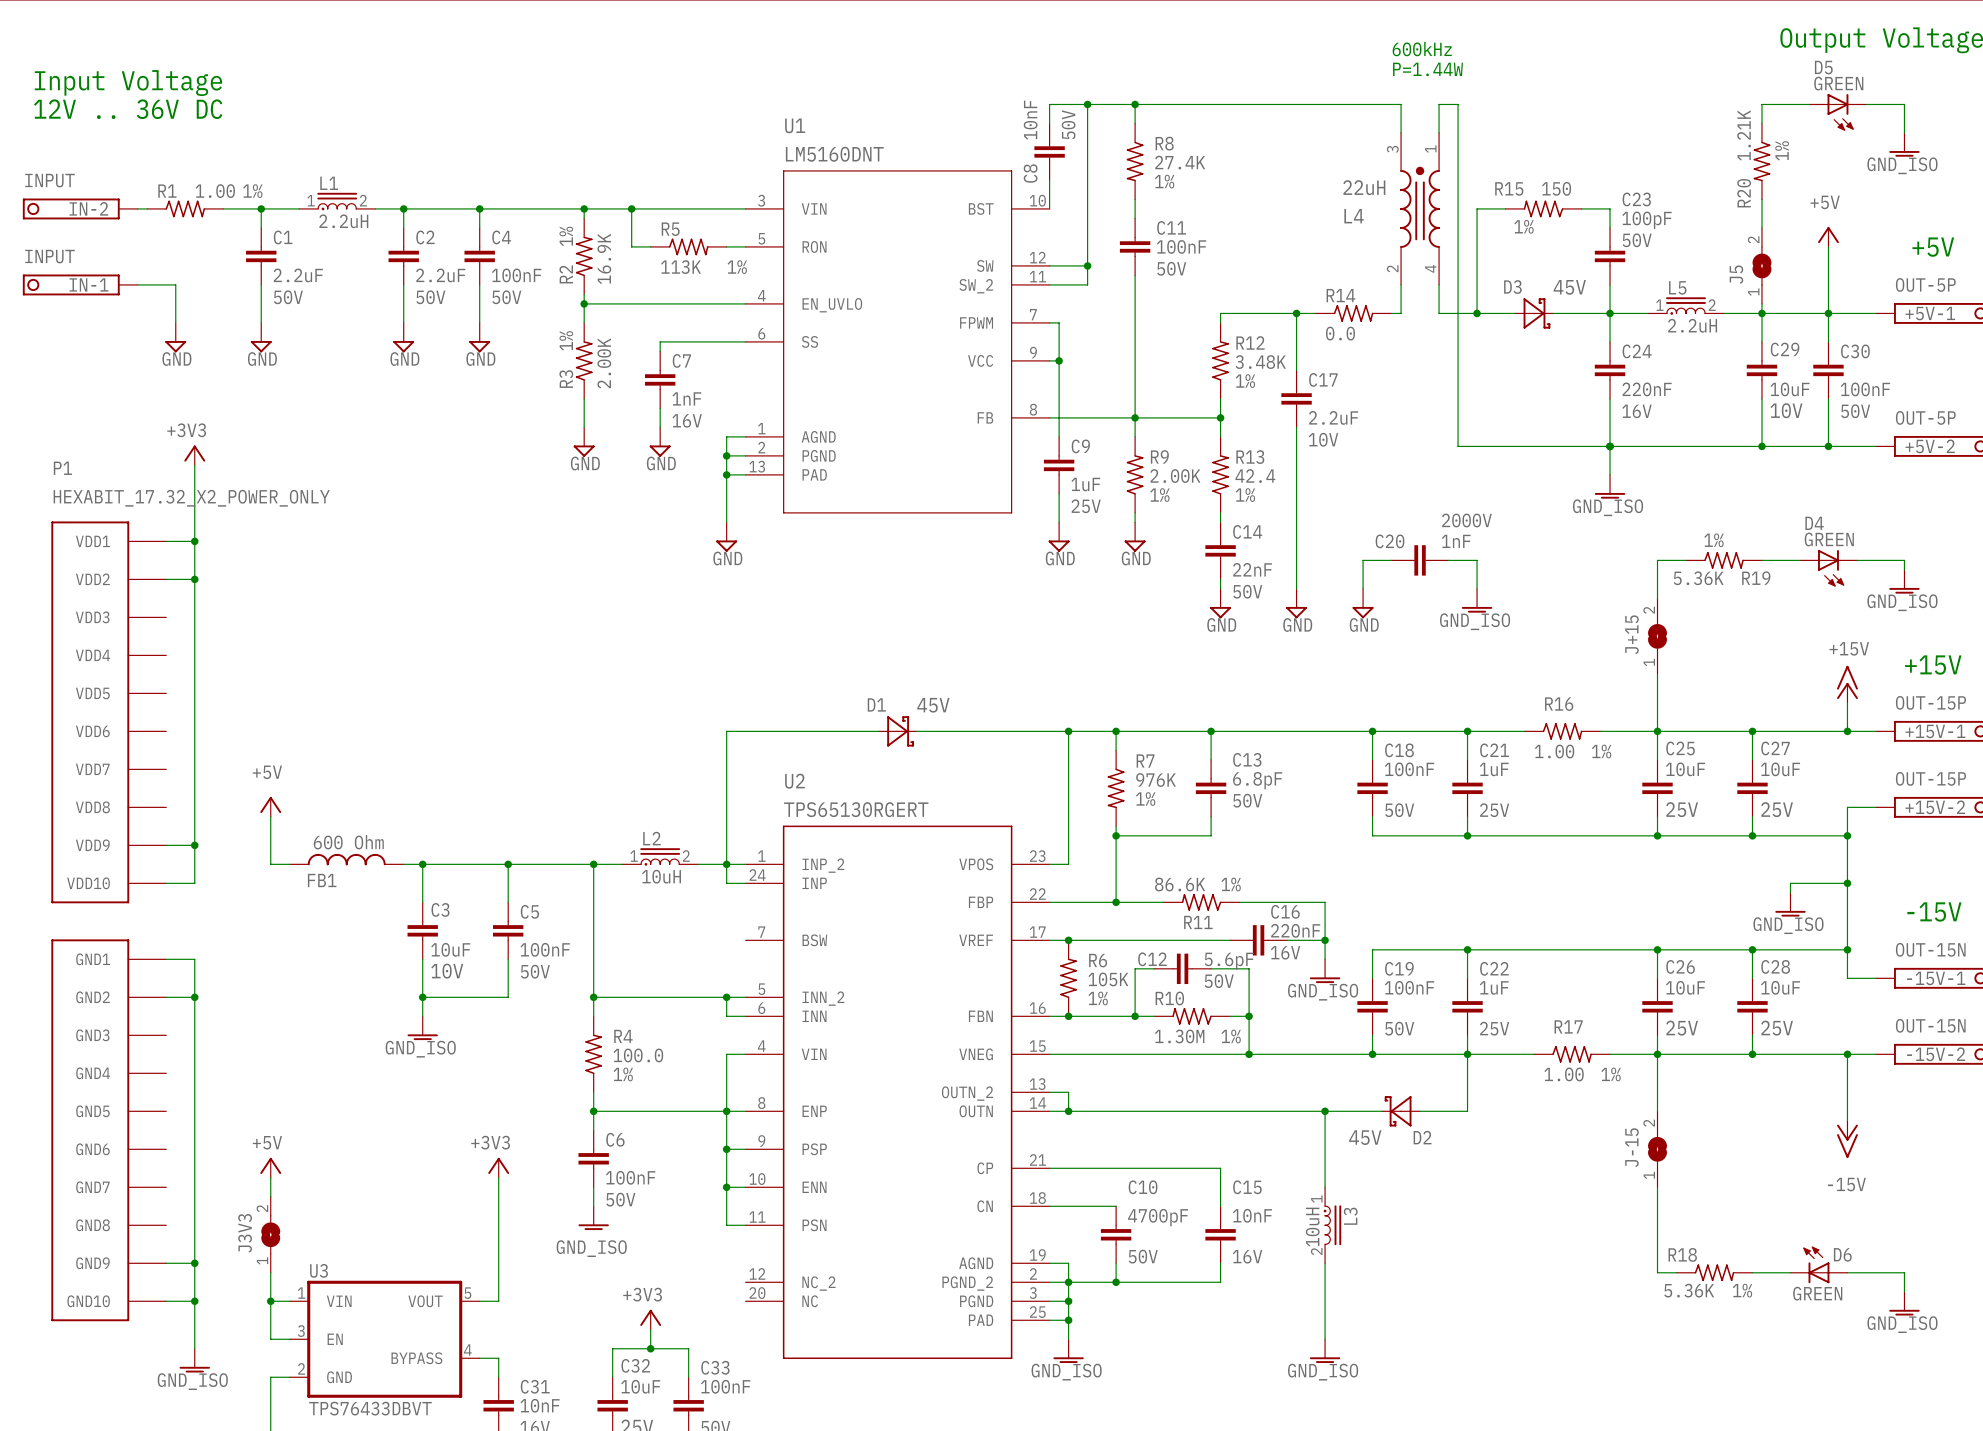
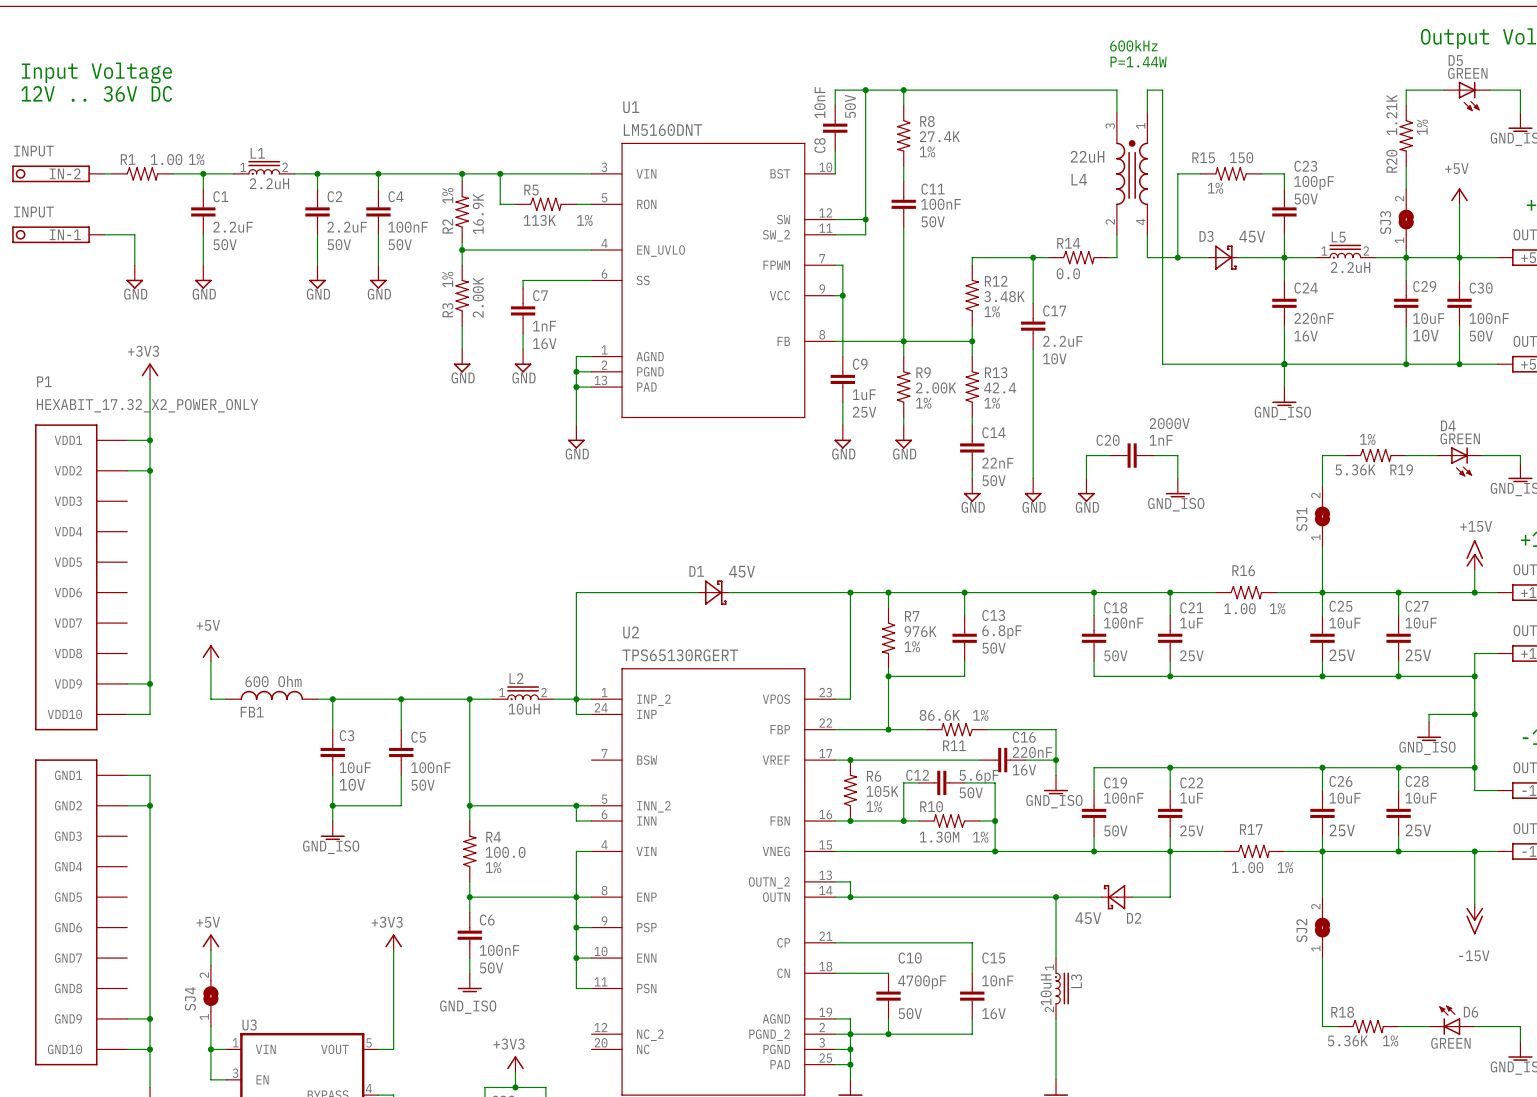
J5 name: J5 (1736, 274) -> SJ3 (1385, 222)
J+15 name: J+15 (1631, 634) -> SJ1 (1301, 519)
J-15 name: J-15 (1631, 1147) -> SJ2 (1301, 930)
J3V3 name: J3V3 (245, 1233) -> SJ4 (190, 998)

